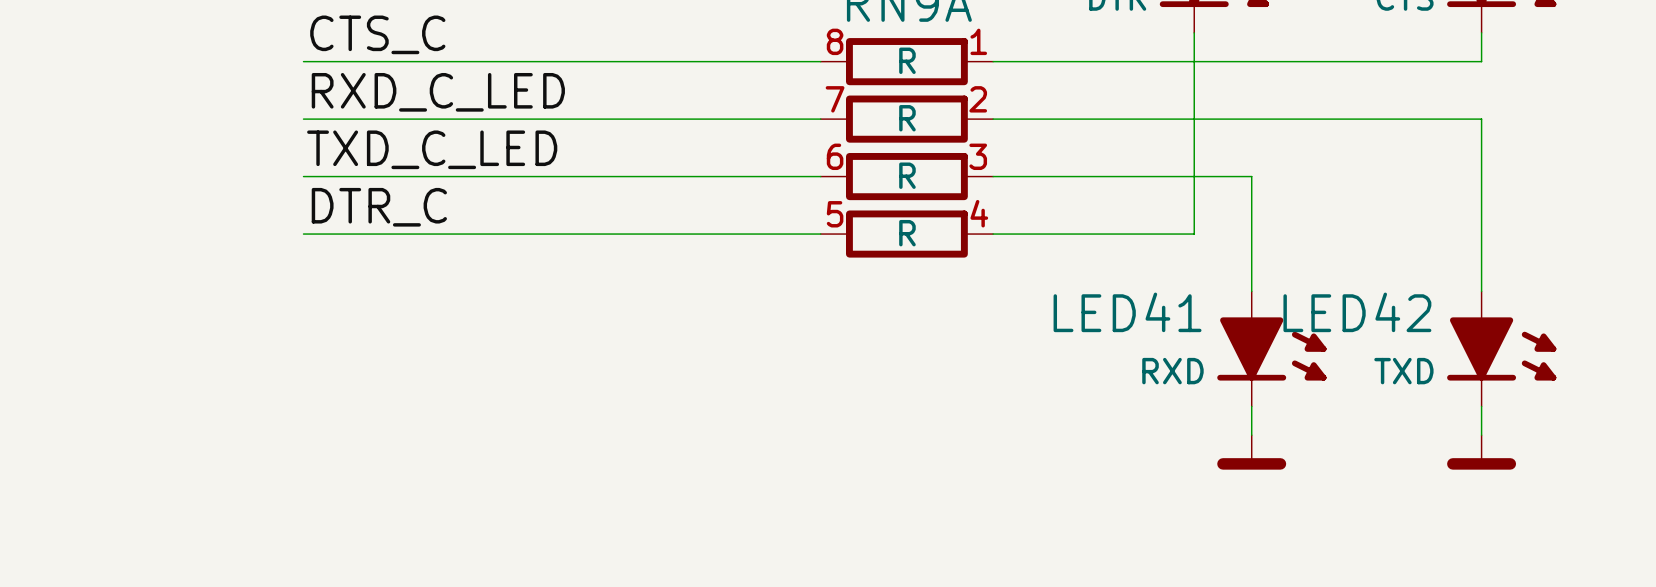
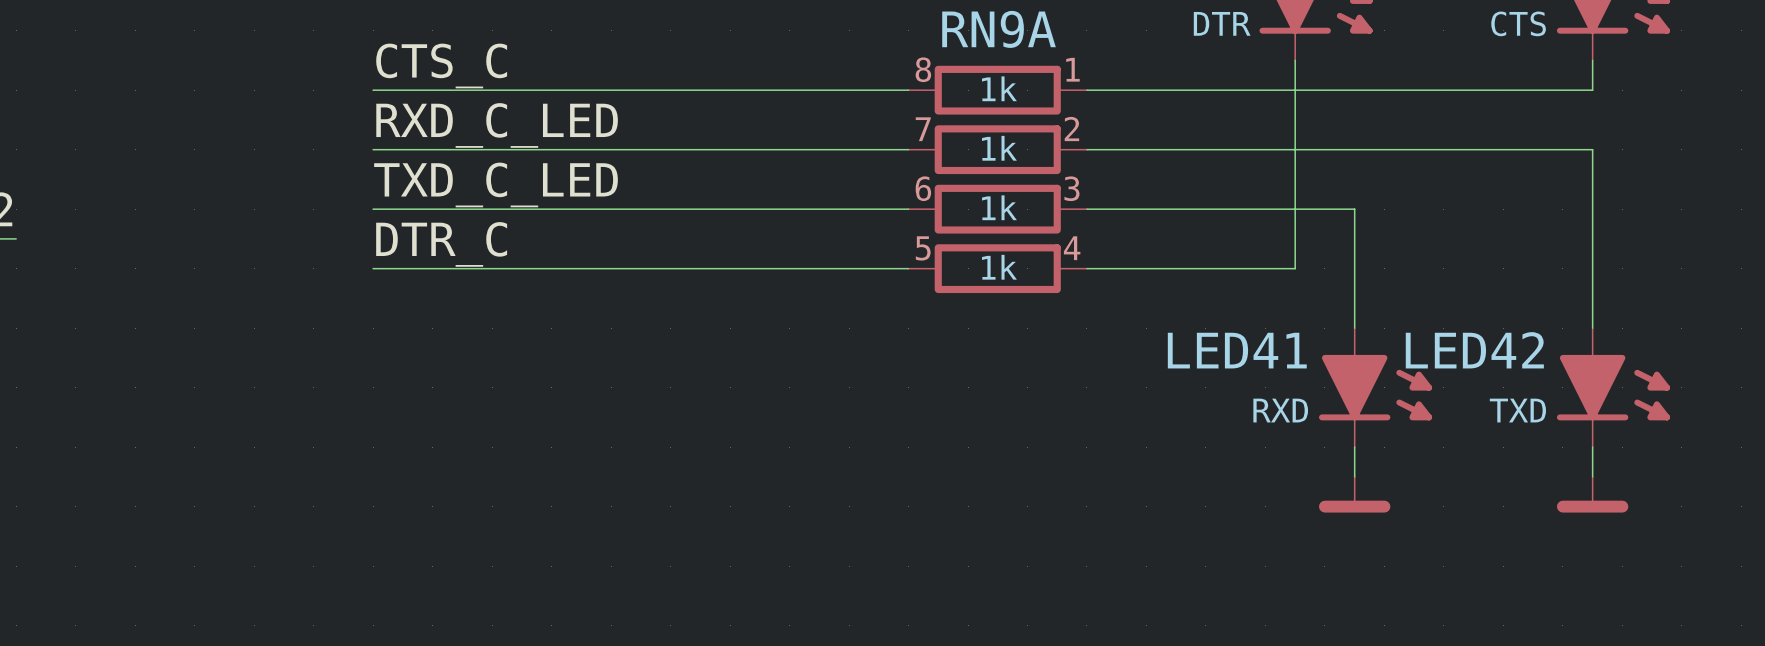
RN9A value: R (907, 60) -> 1k (999, 88)
part value: R (907, 118) -> 1k (999, 148)
part value: R (907, 175) -> 1k (999, 207)
part value: R (907, 233) -> 1k (999, 267)

